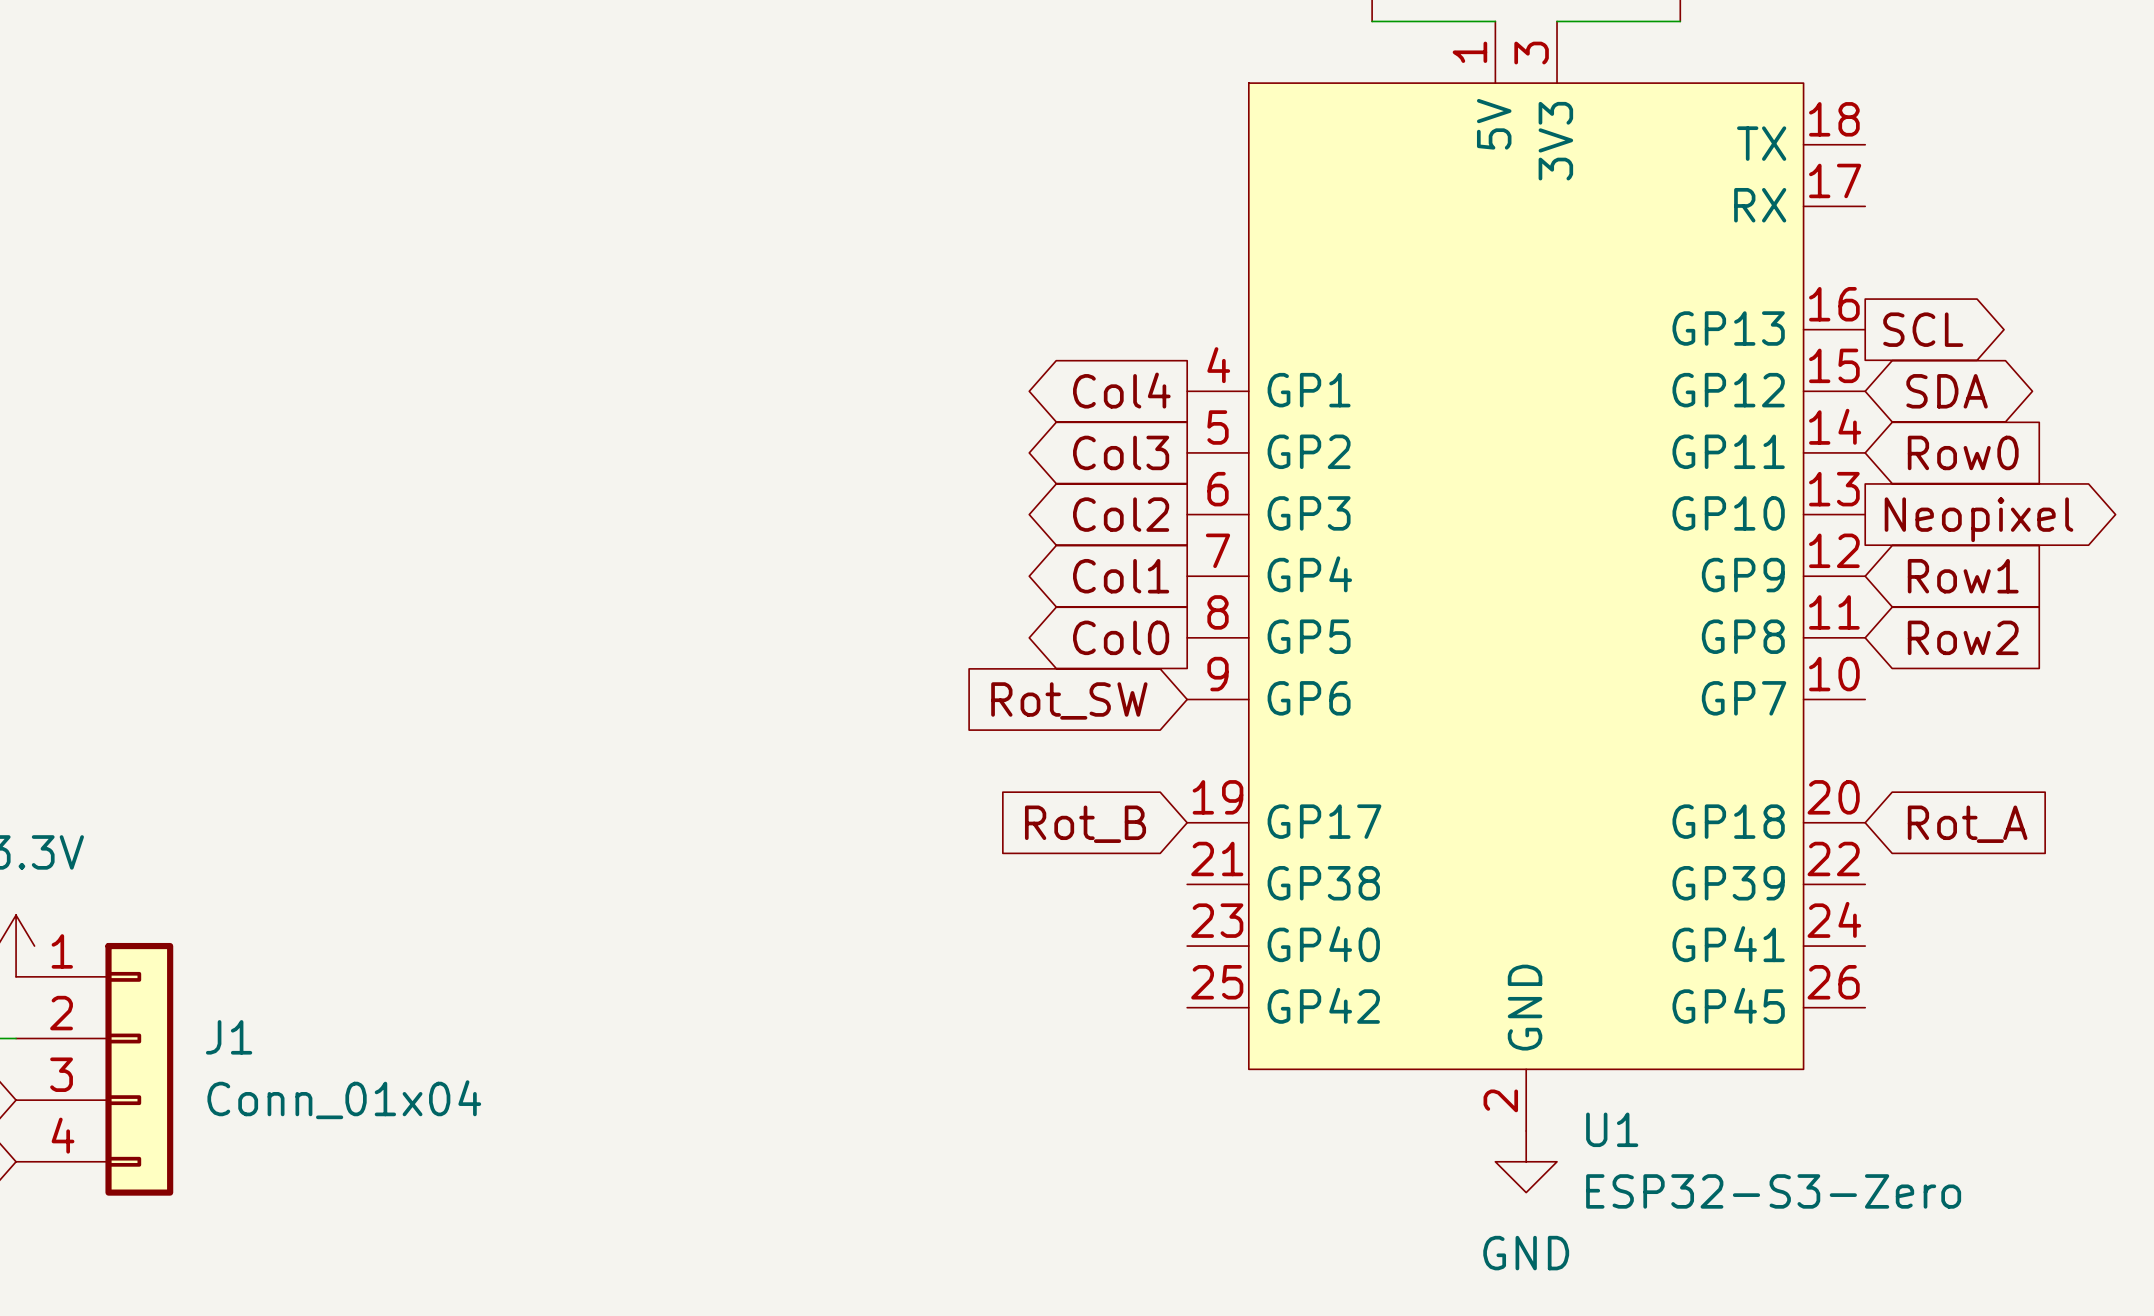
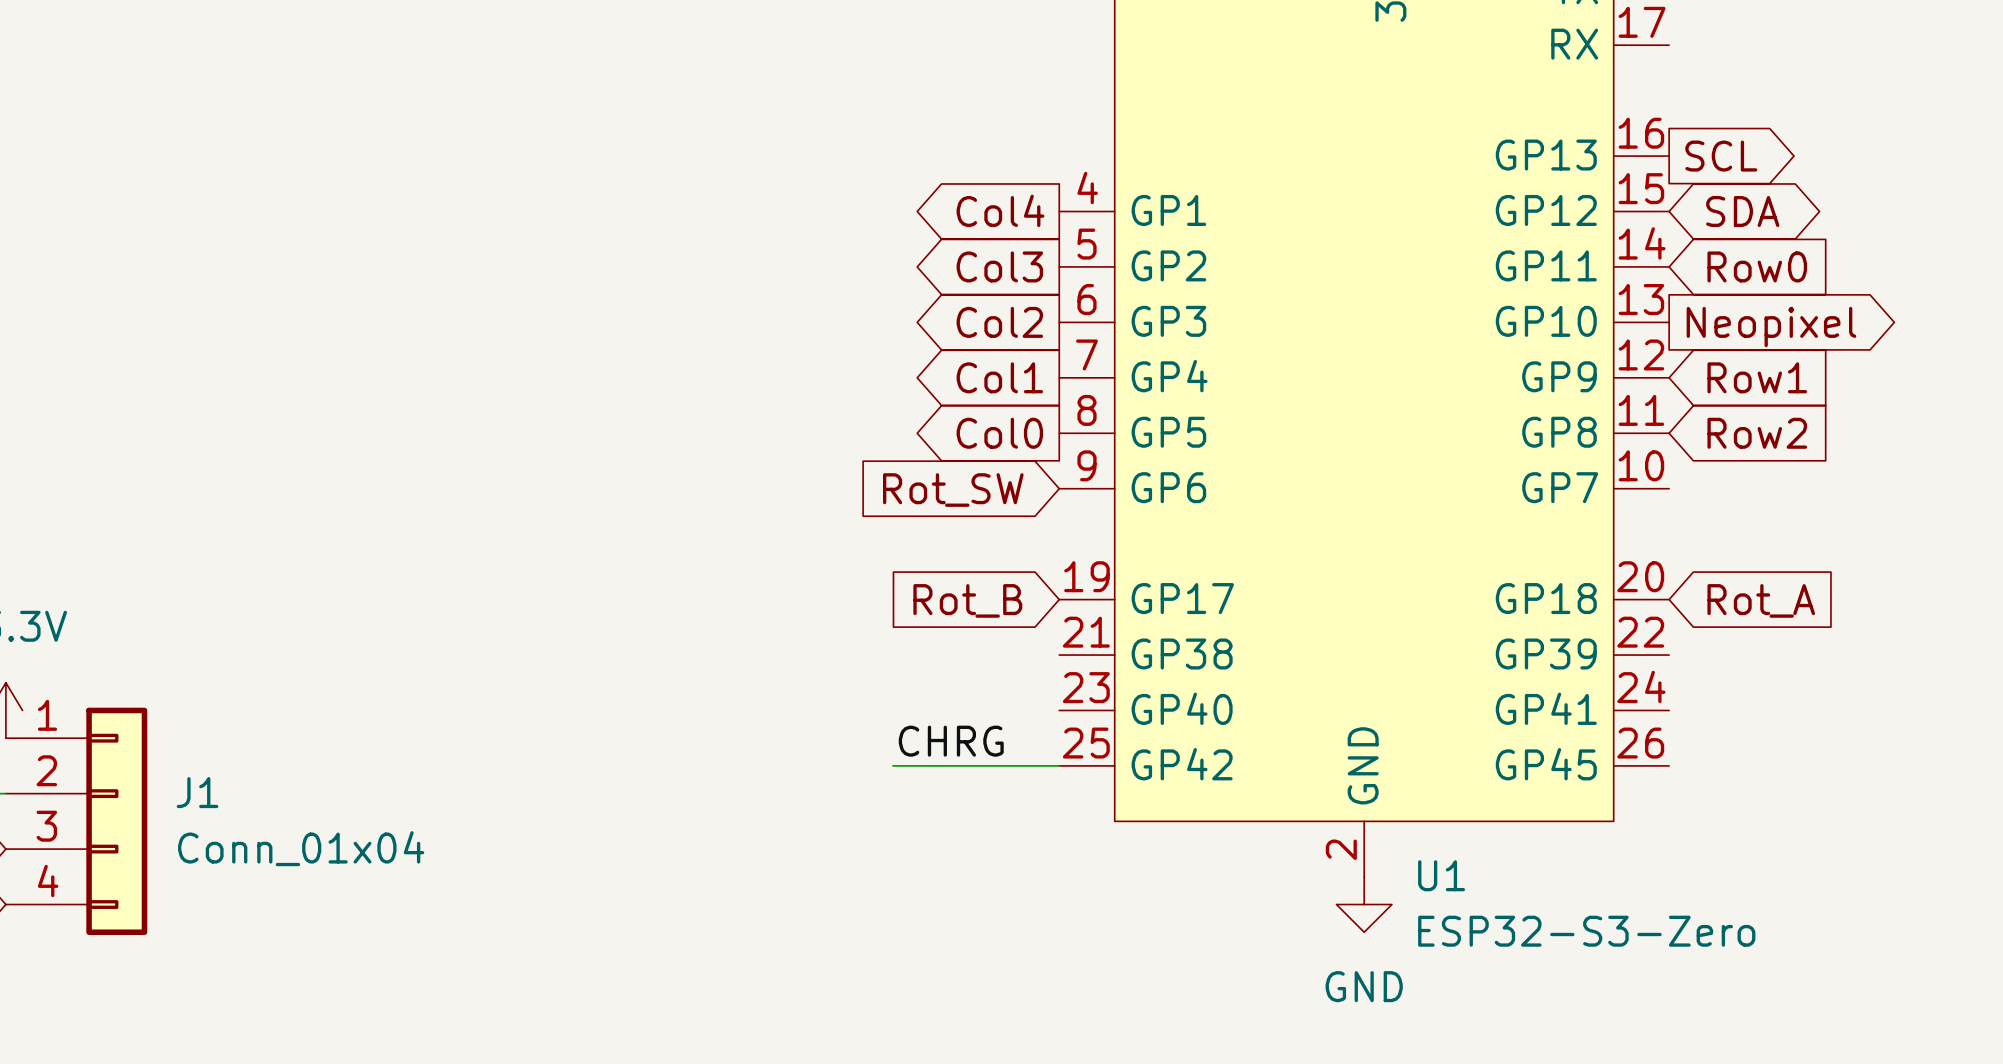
label: none -> CHRG (951, 741)
wire: none -> (892, 765) (1059, 765)

